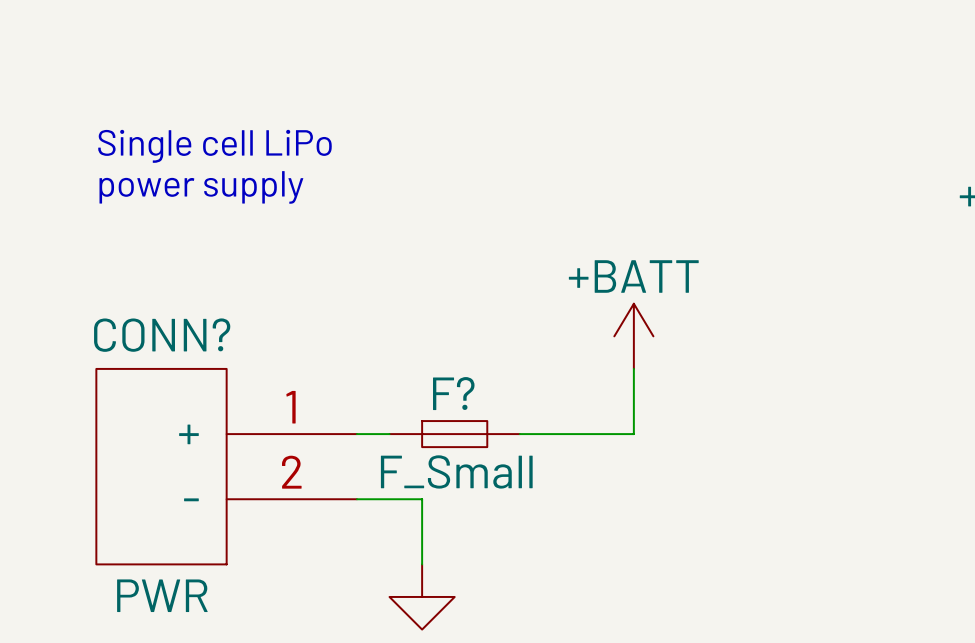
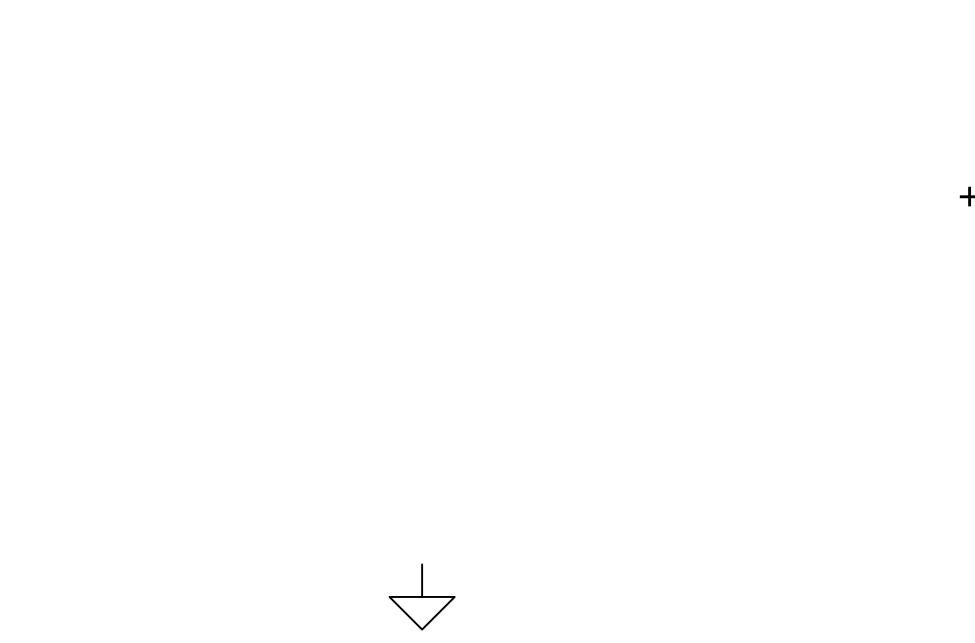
text: Single cell LiPo (214, 146) -> none
text: power supply (201, 187) -> none
power symbol: +BATT (633, 336) -> none
wire: (633, 368) (633, 434) (519, 434) -> none
wire: (356, 434) (389, 434) -> none
F?: F_Small (454, 434) -> none
CONN?: PWR (226, 466) -> none
wire: (356, 499) (422, 499) (422, 564) -> none

